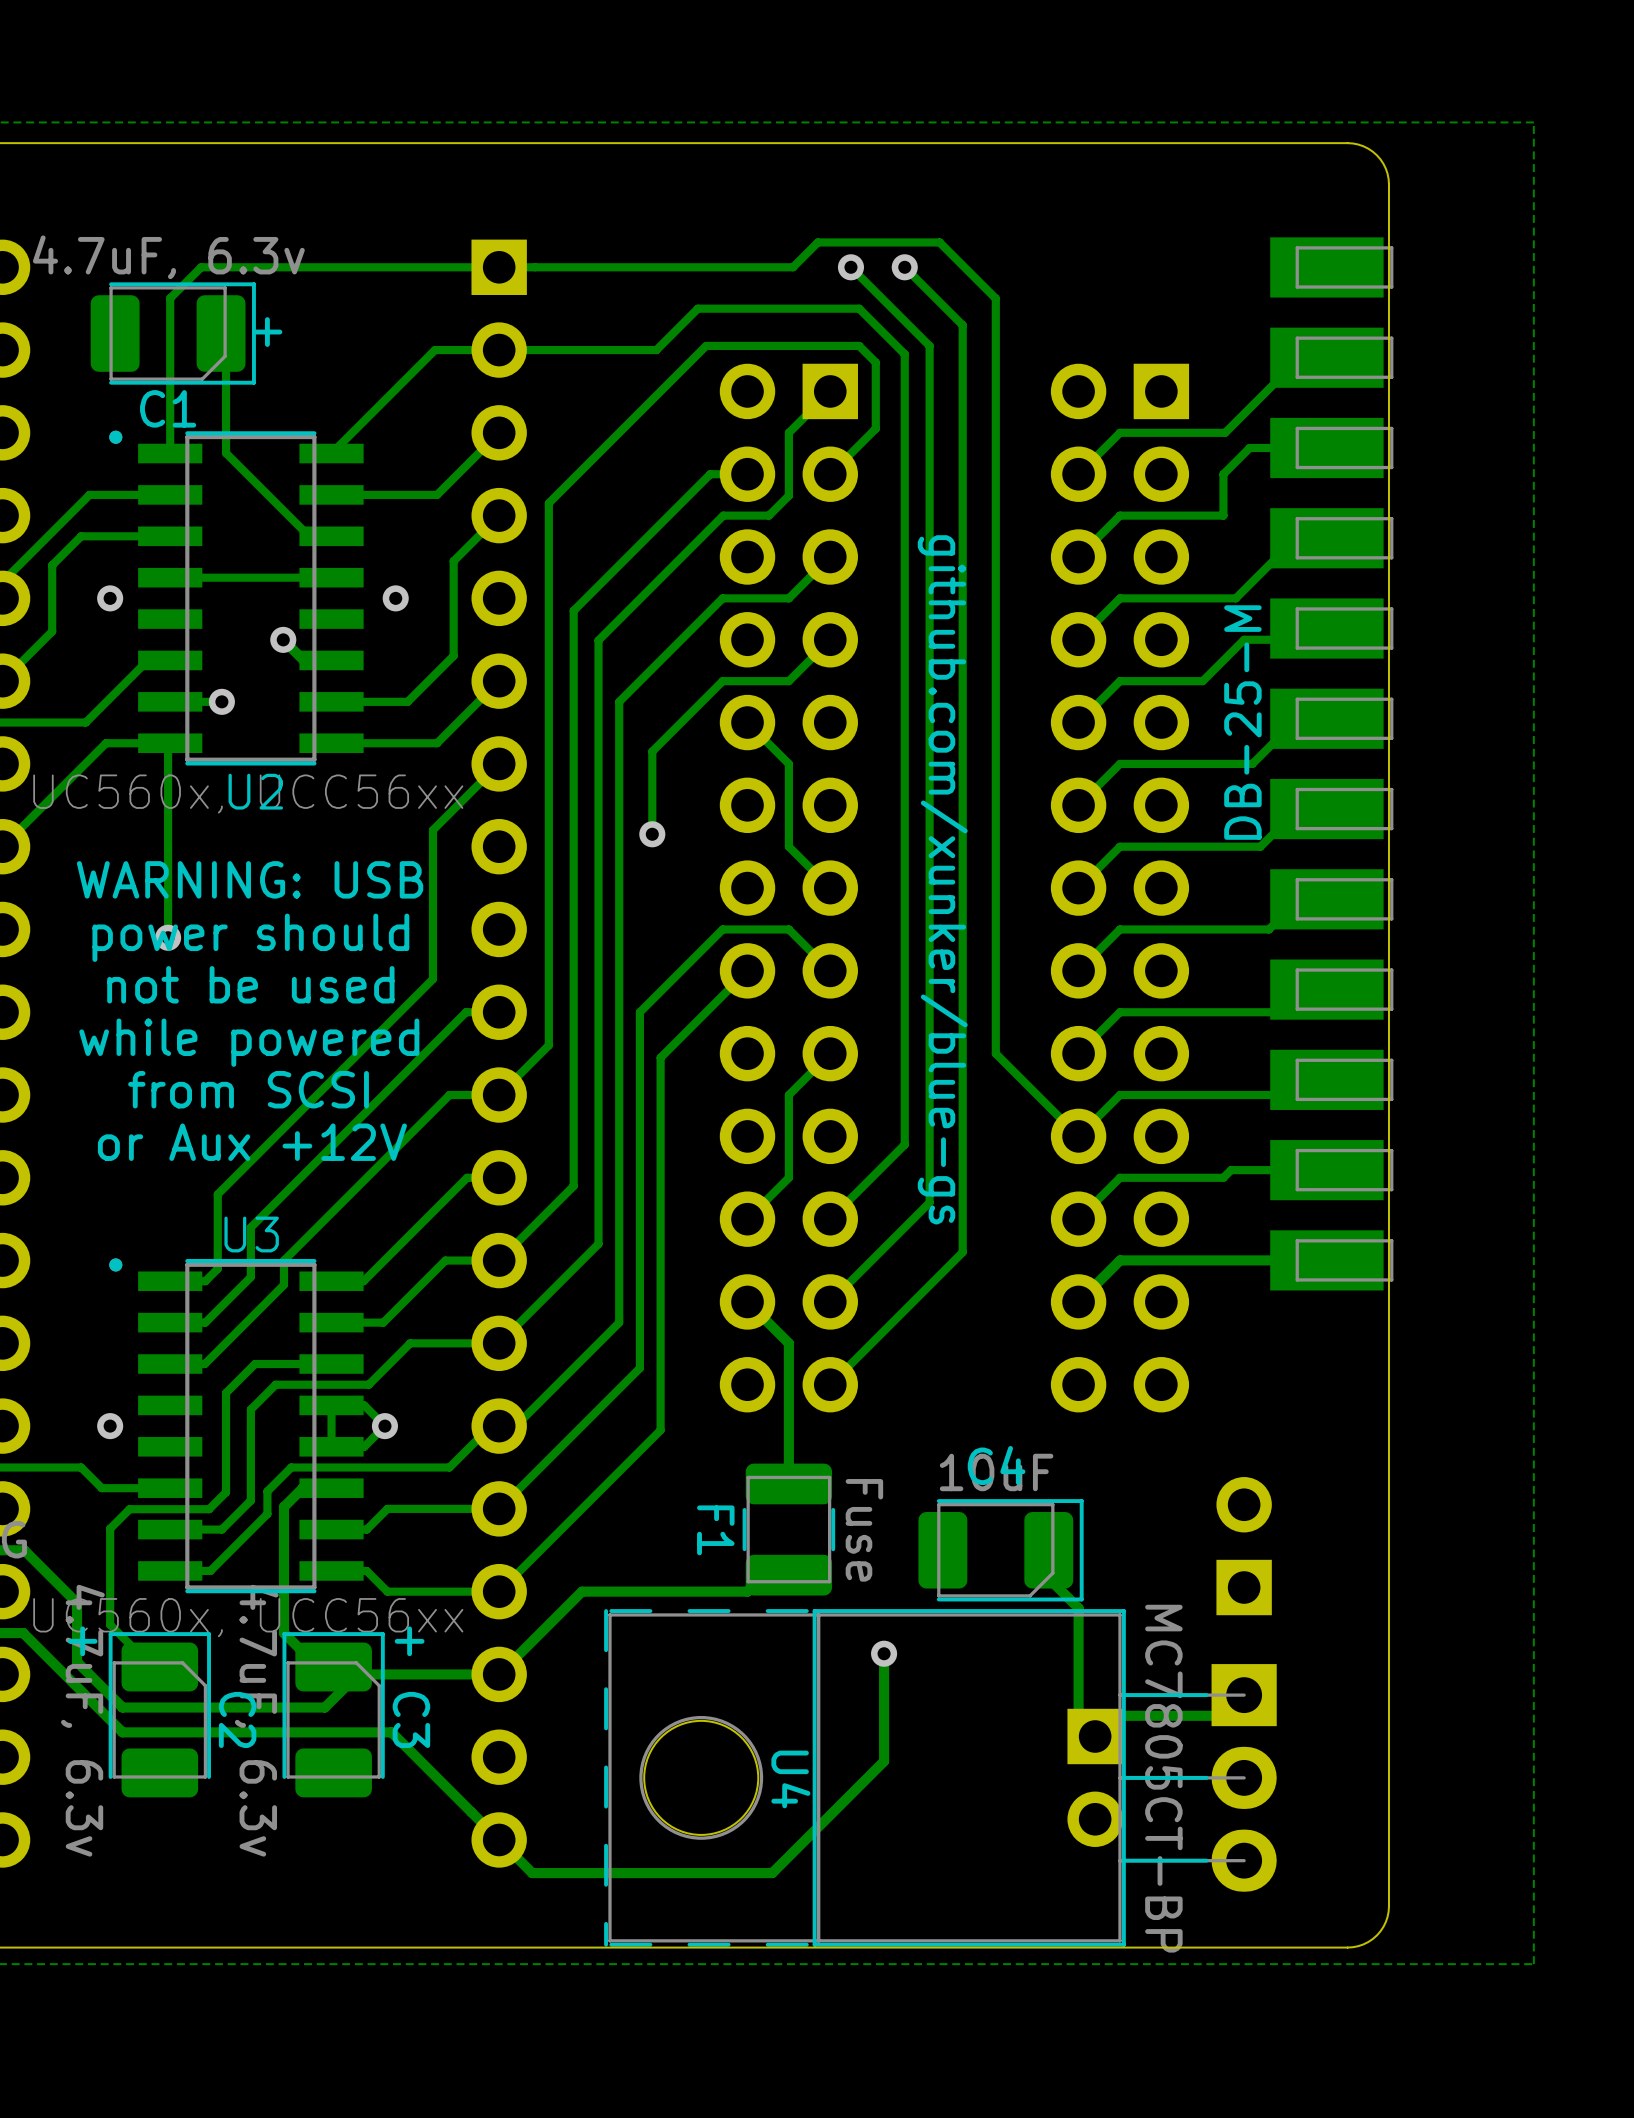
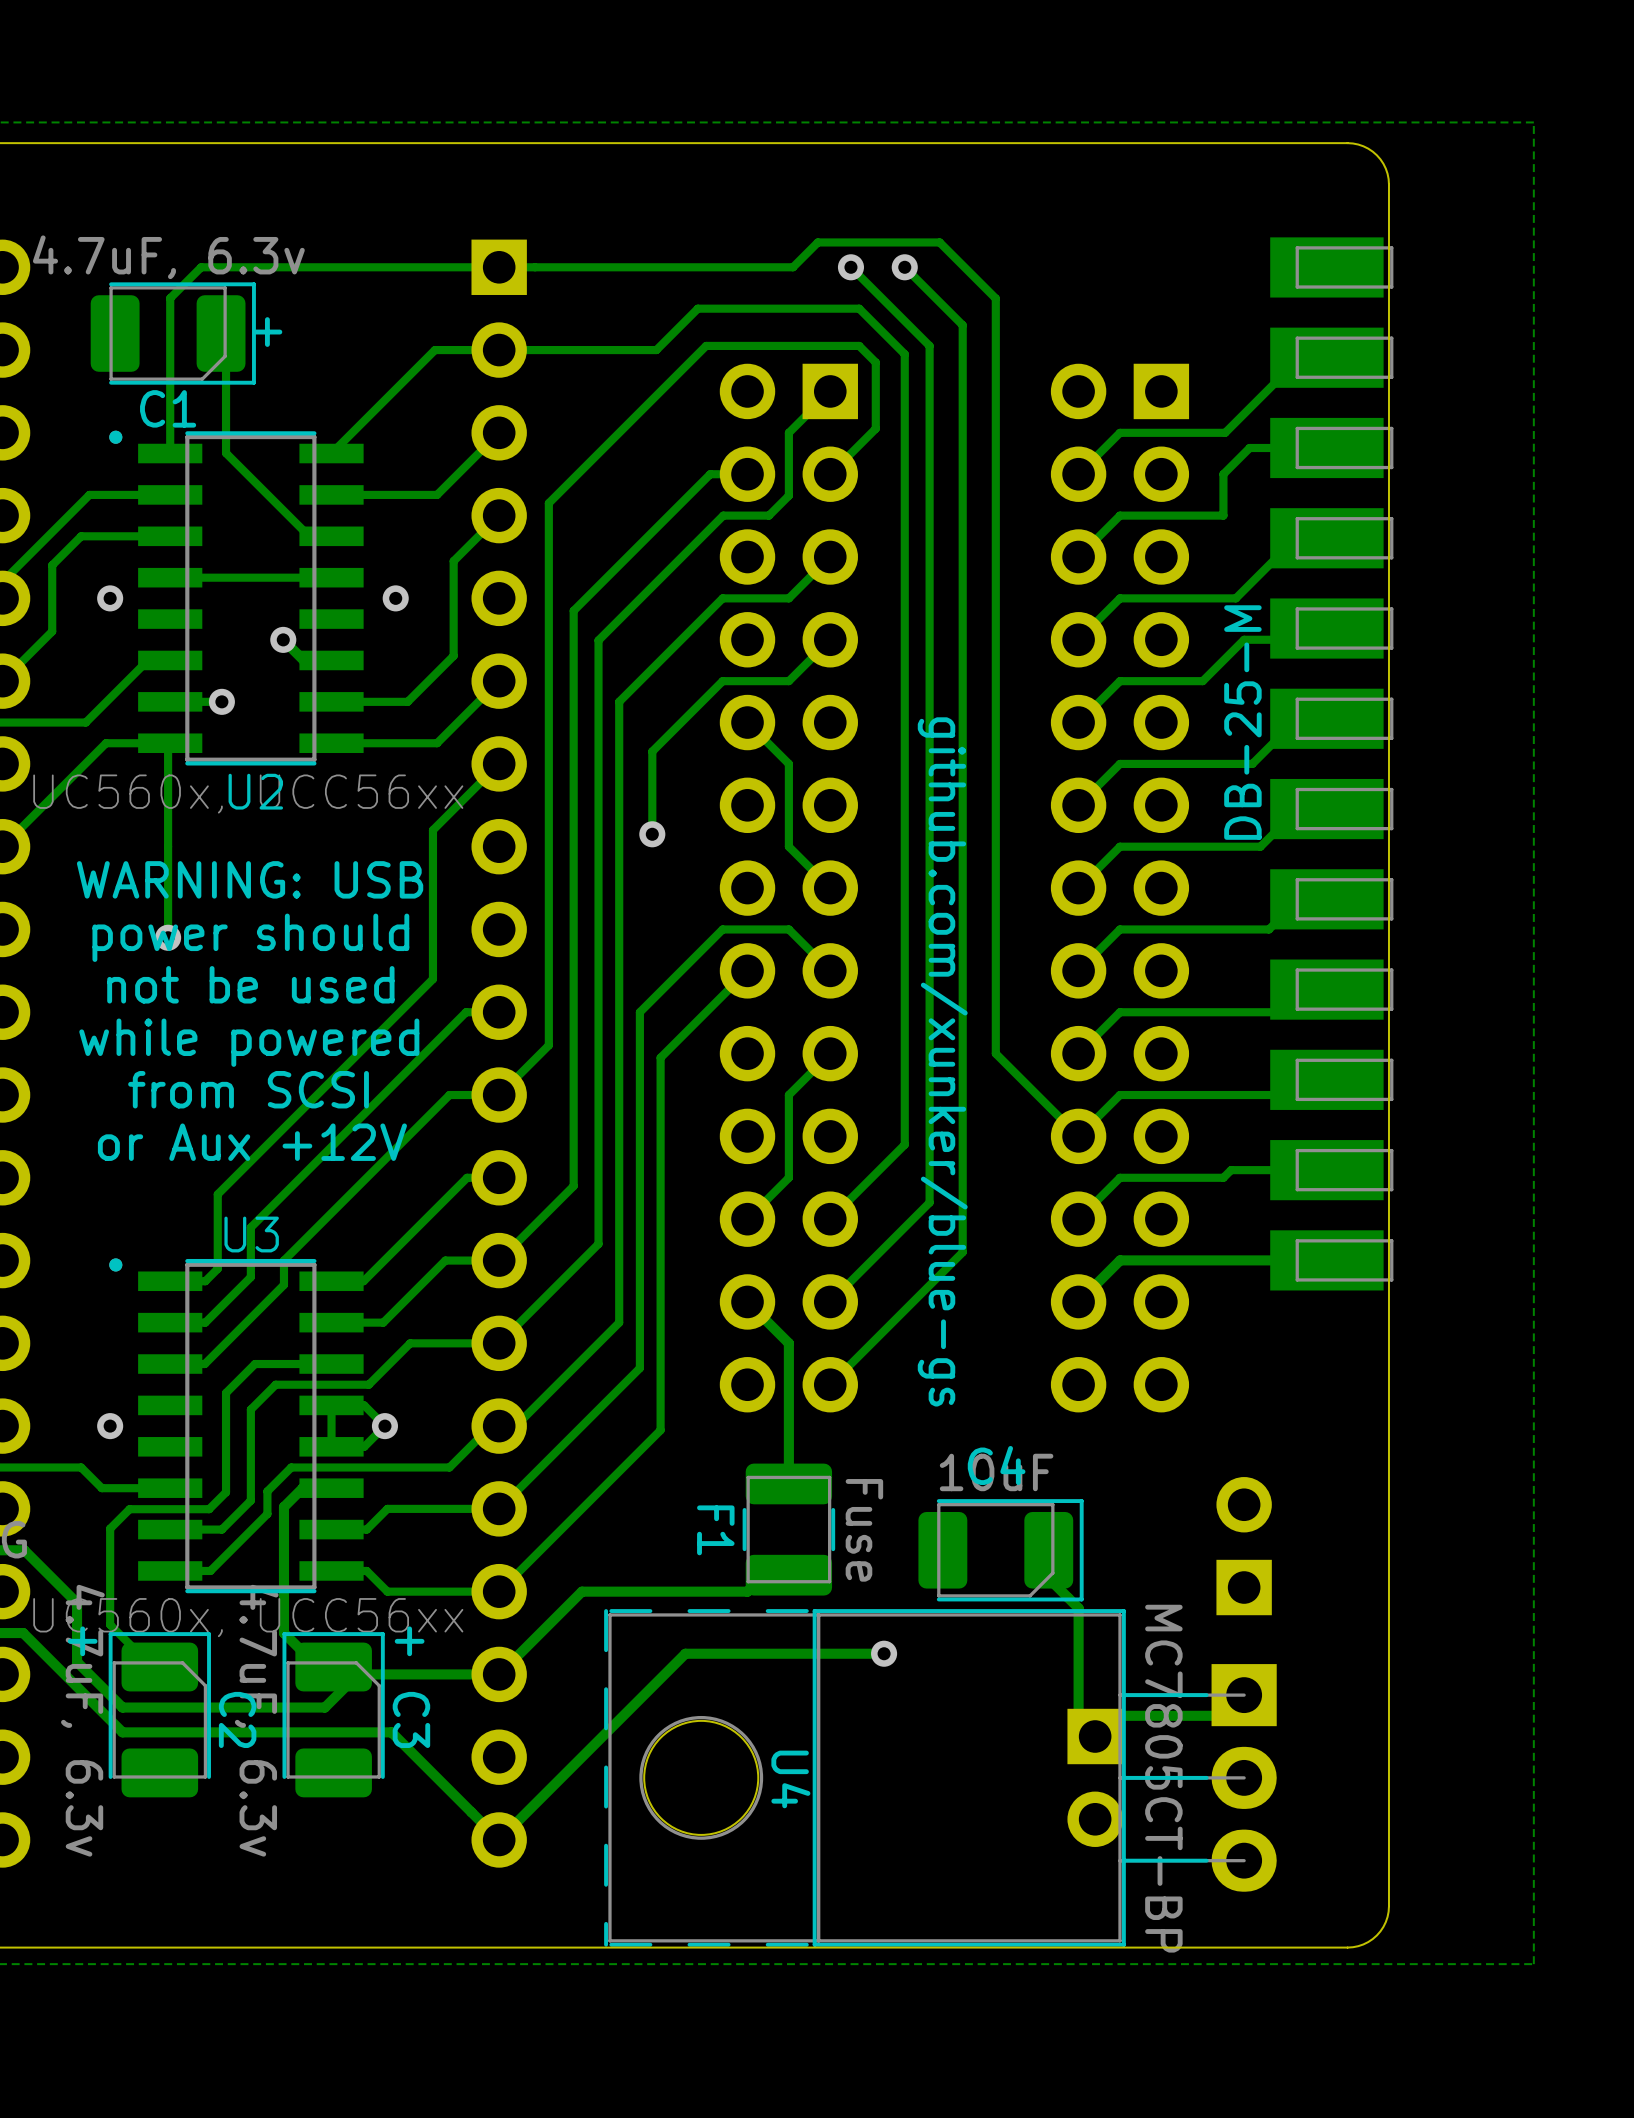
text position: github.com/xunker/blue-gs (942, 879) -> github.com/xunker/blue-gs (942, 1061)
track: (884, 1653) (884, 1761) (772, 1873) (532, 1873) (499, 1839) -> (884, 1653) (685, 1653) (499, 1839)

